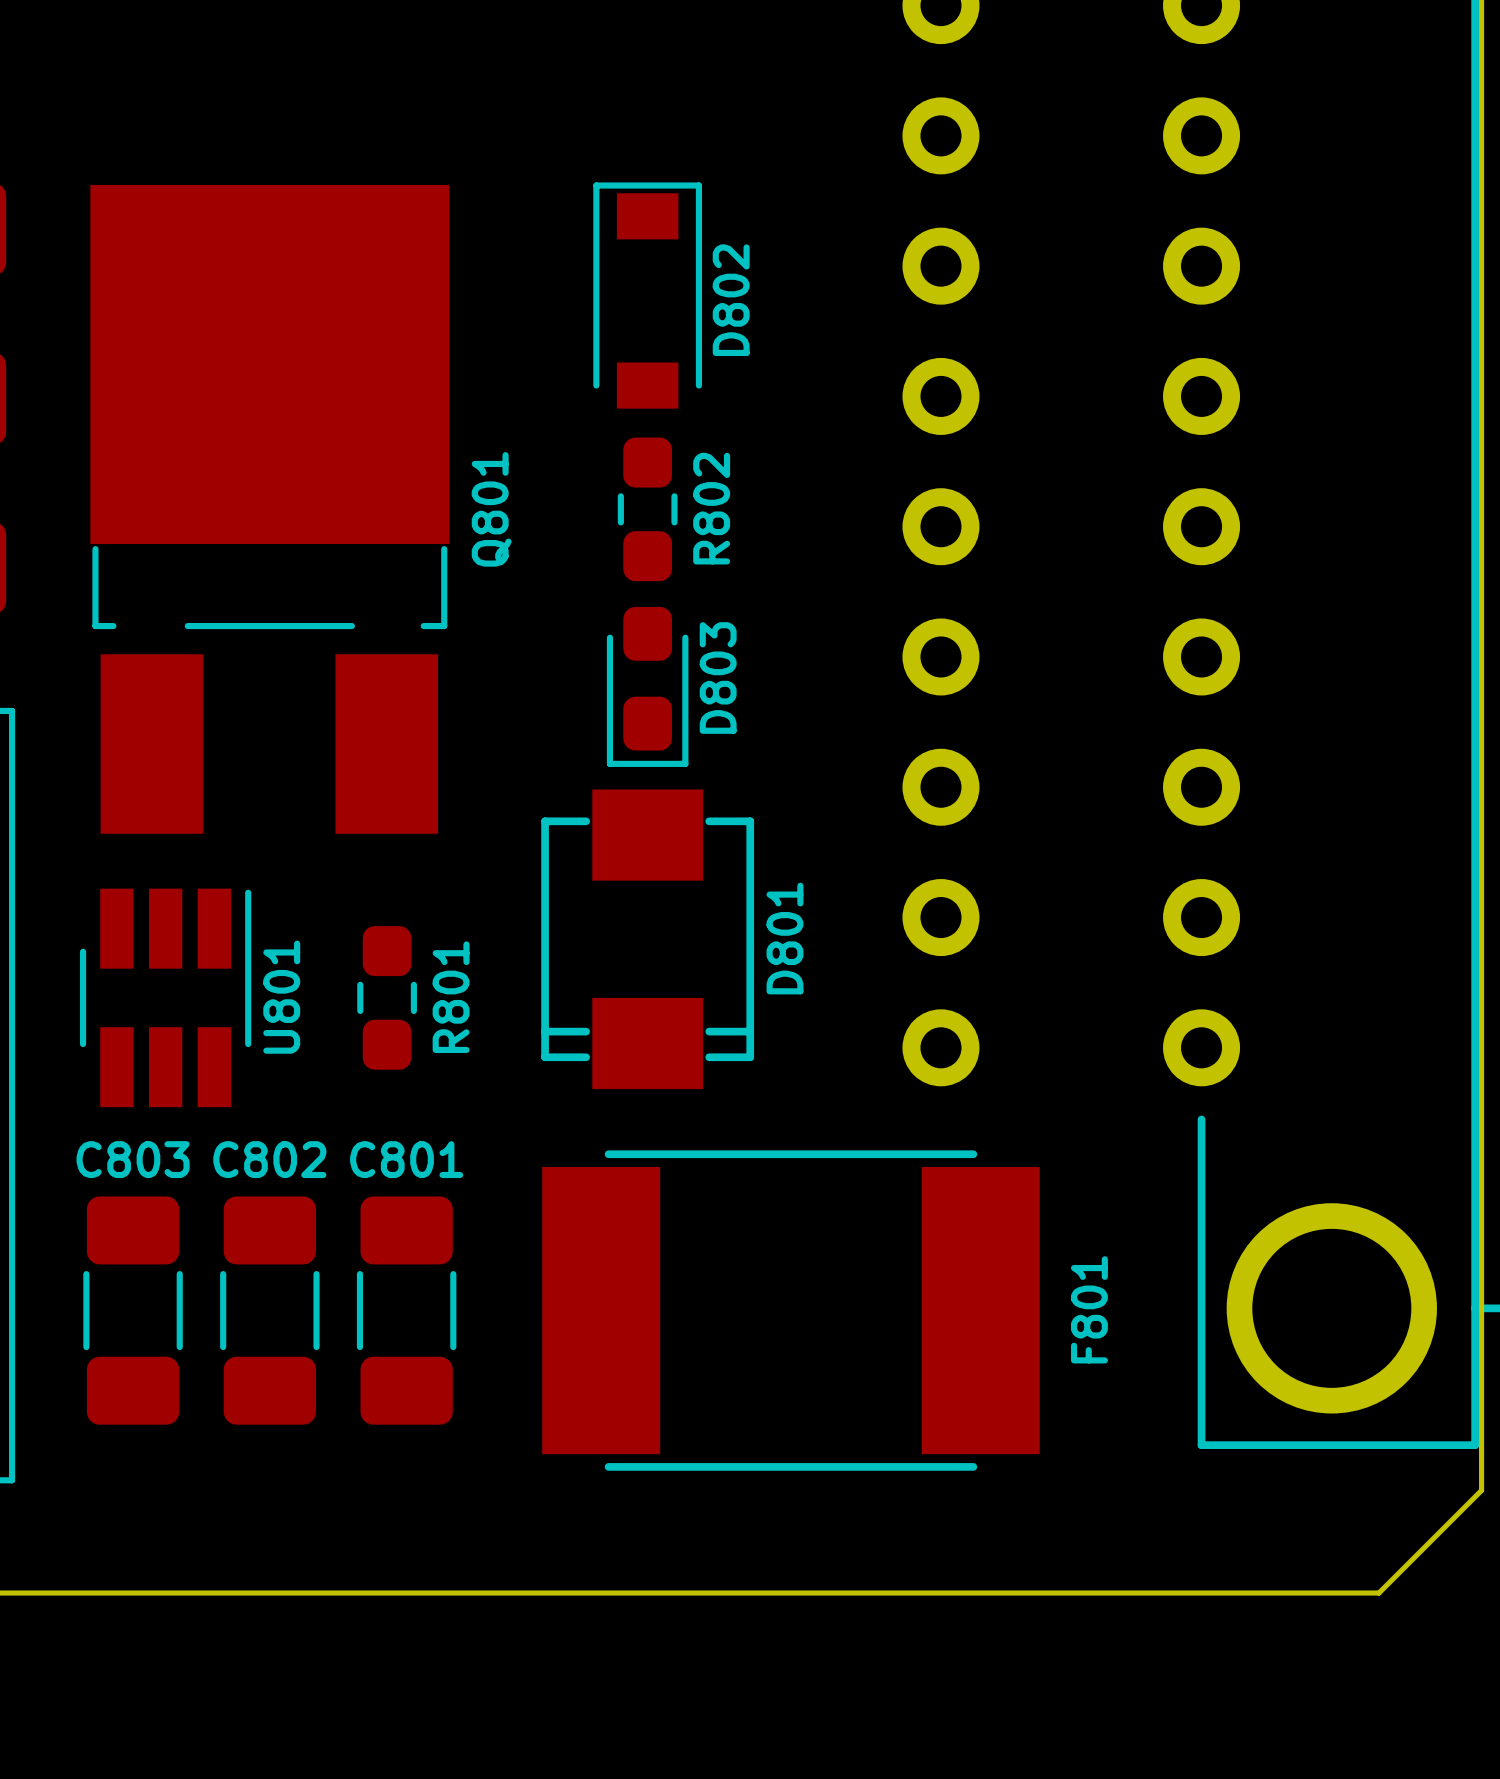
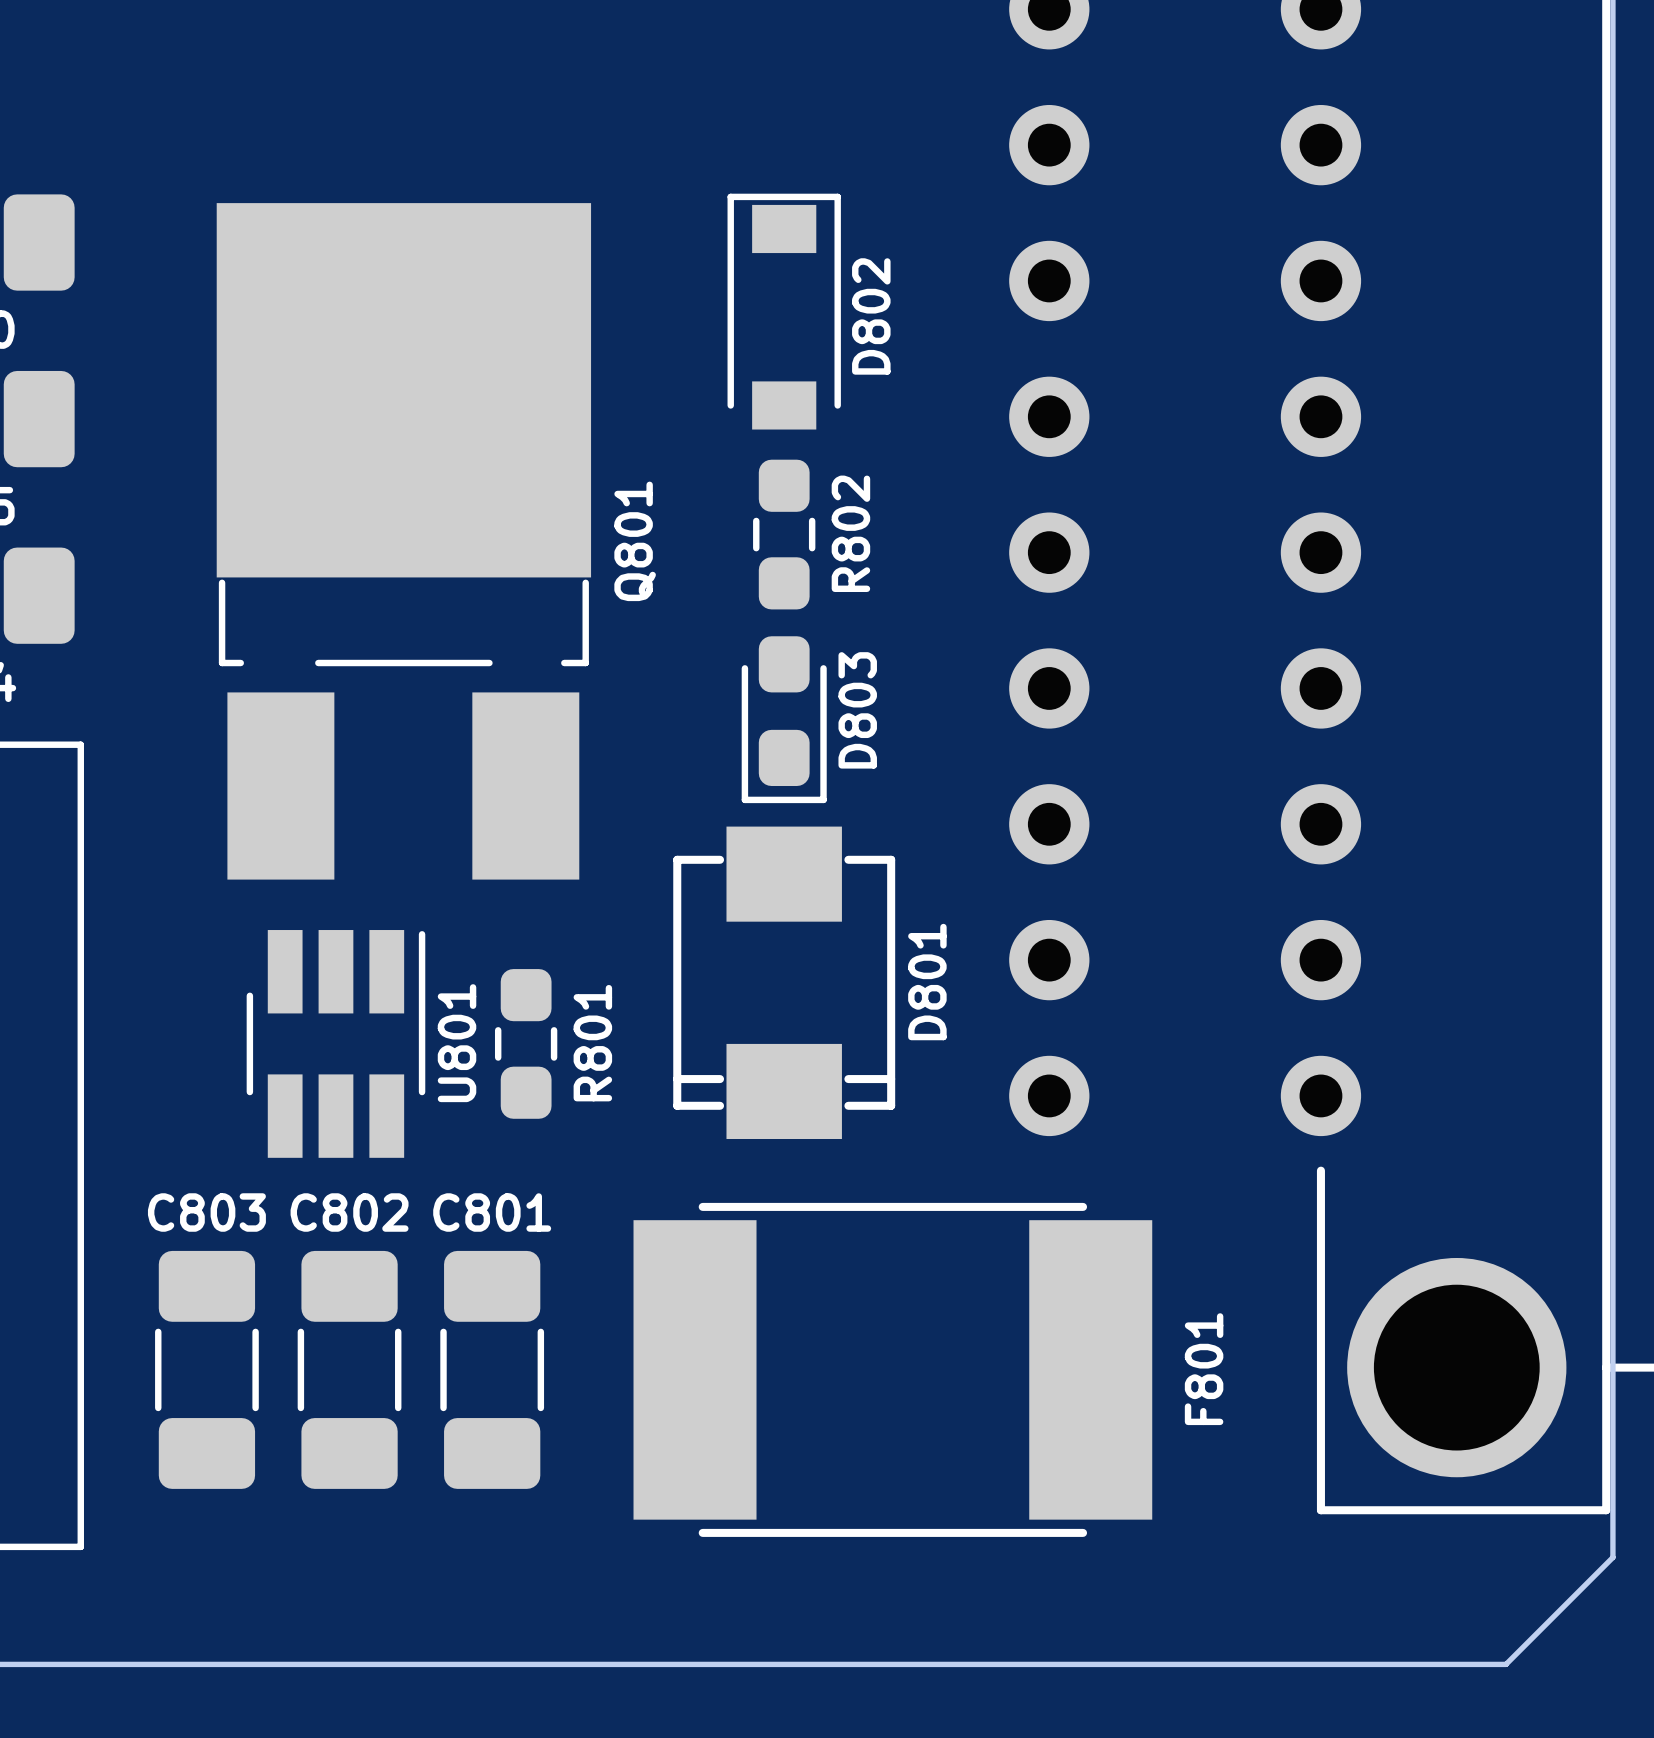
D802 position: (647, 295) -> (784, 311)
Q801 position: (269, 509) -> (403, 541)
R802 position: (647, 509) -> (784, 534)
D803 position: (647, 686) -> (784, 719)
D801 position: (647, 939) -> (784, 982)
U801 position: (165, 997) -> (335, 1043)
R801 position: (387, 997) -> (526, 1043)

